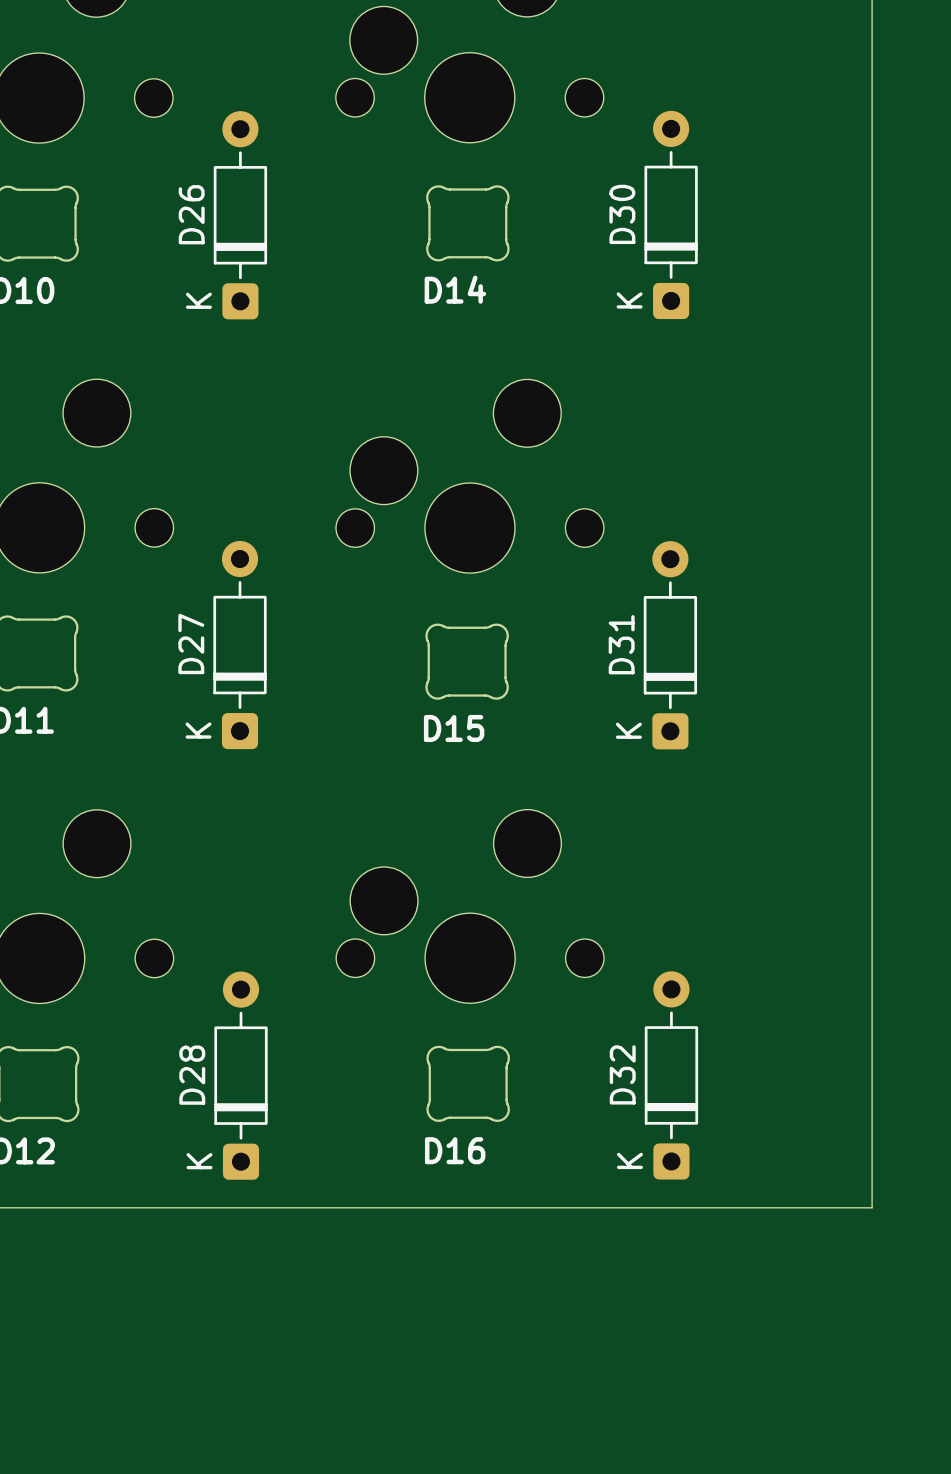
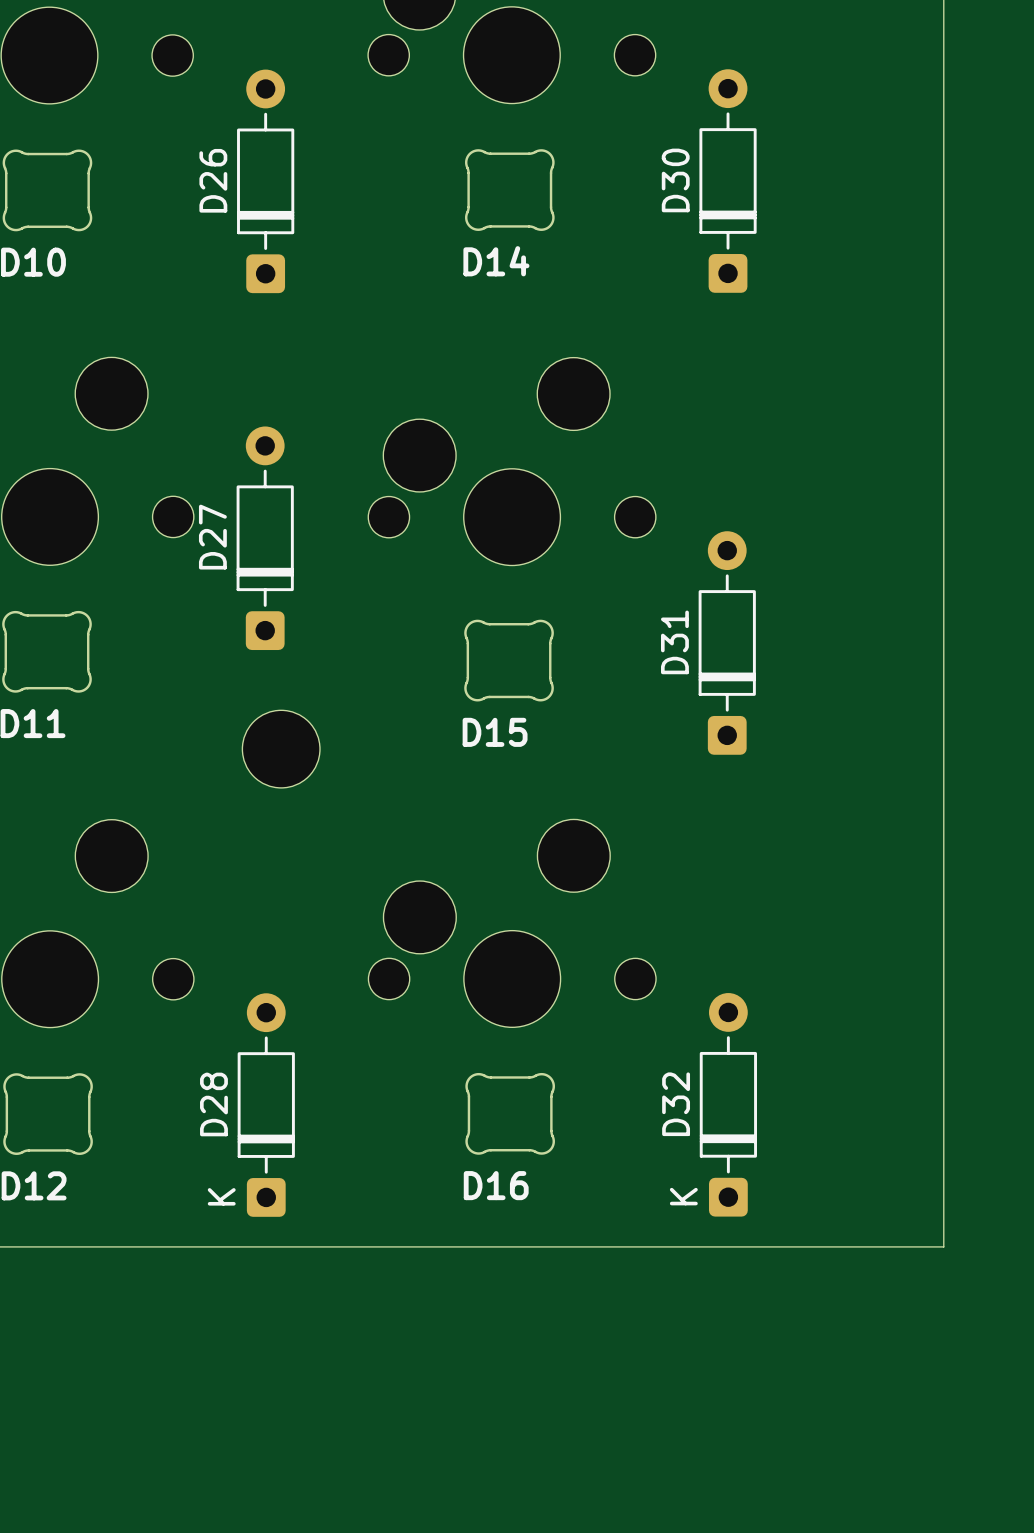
D26 text: K (198, 300) -> none
D30 text: K (629, 300) -> none
D27 position: (240, 645) -> (265, 538)
D27 text: K (198, 730) -> none
D31 text: K (628, 730) -> none
part: none -> (281, 749)

